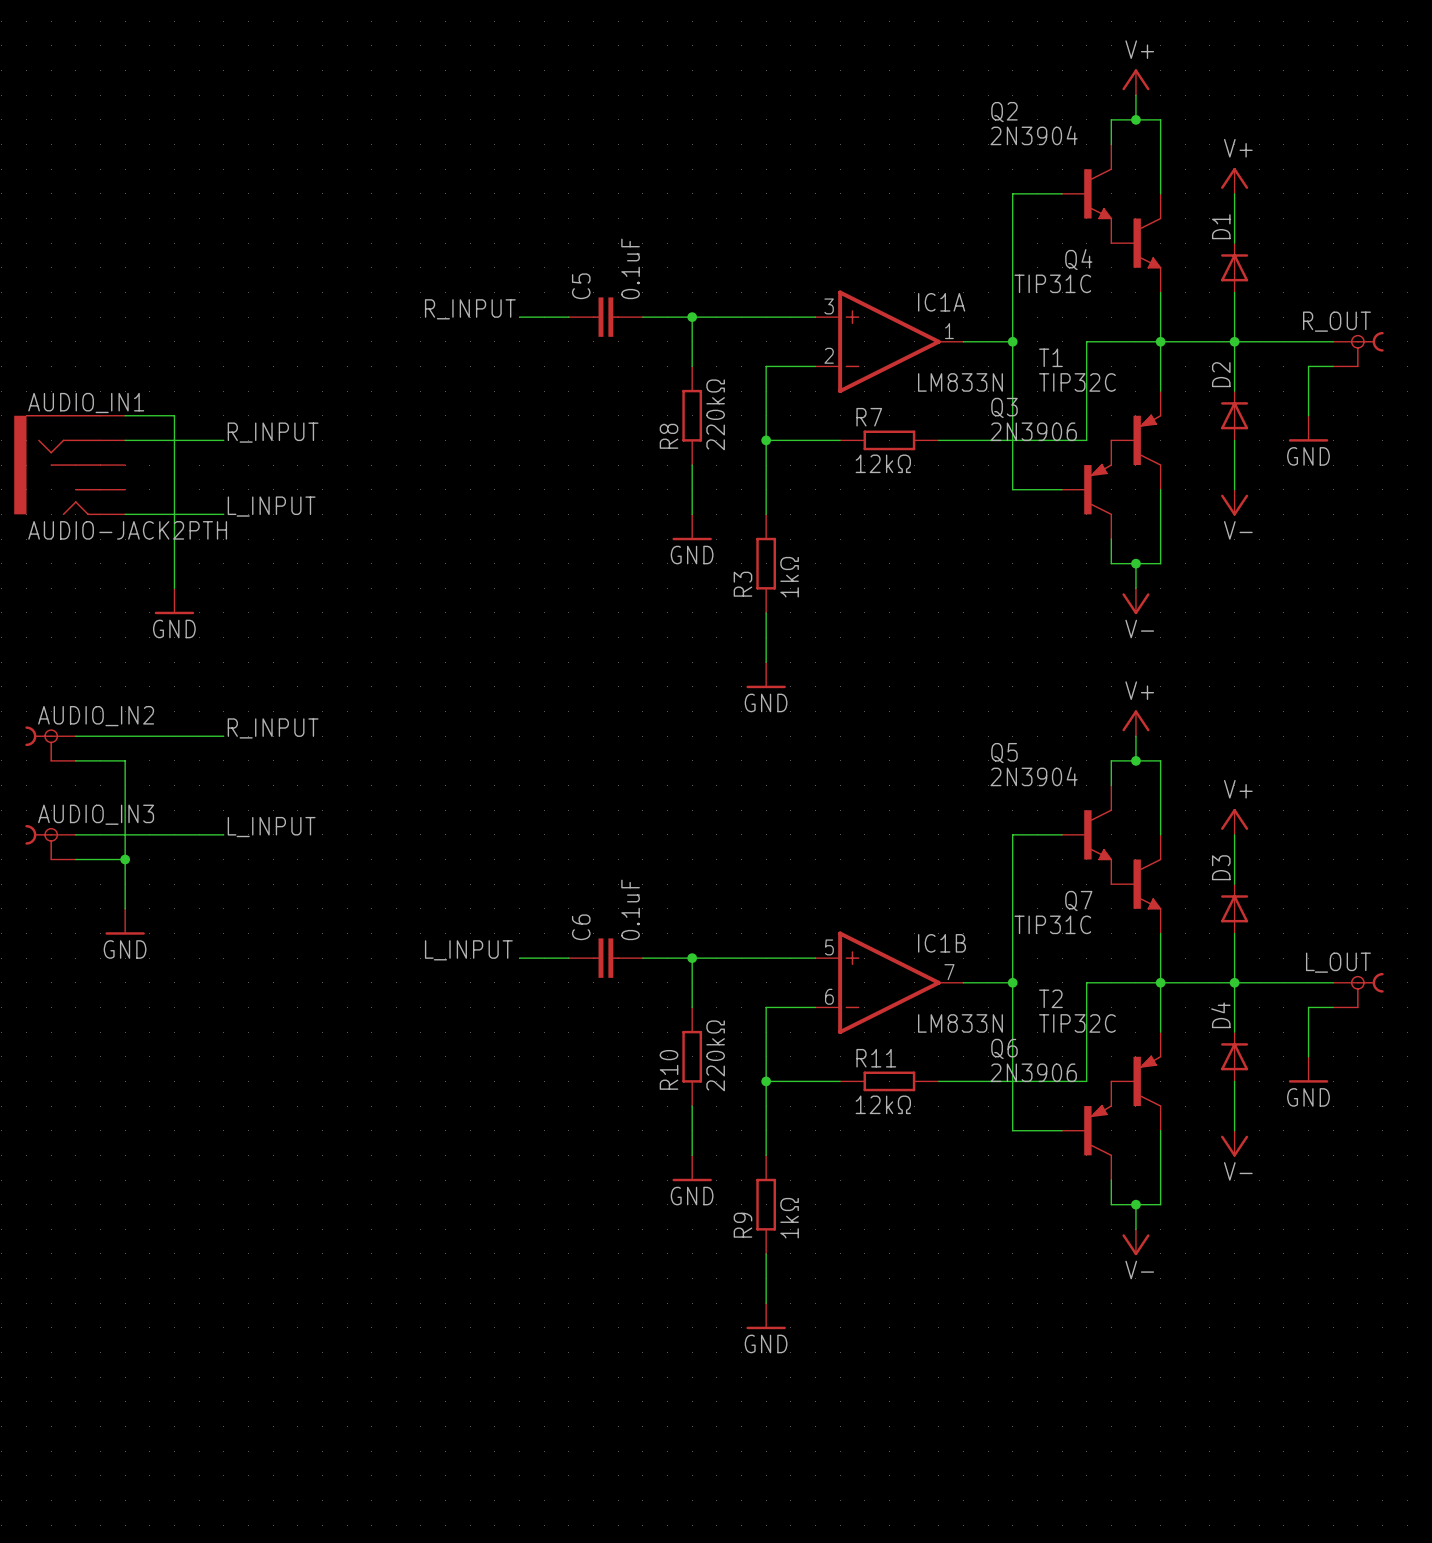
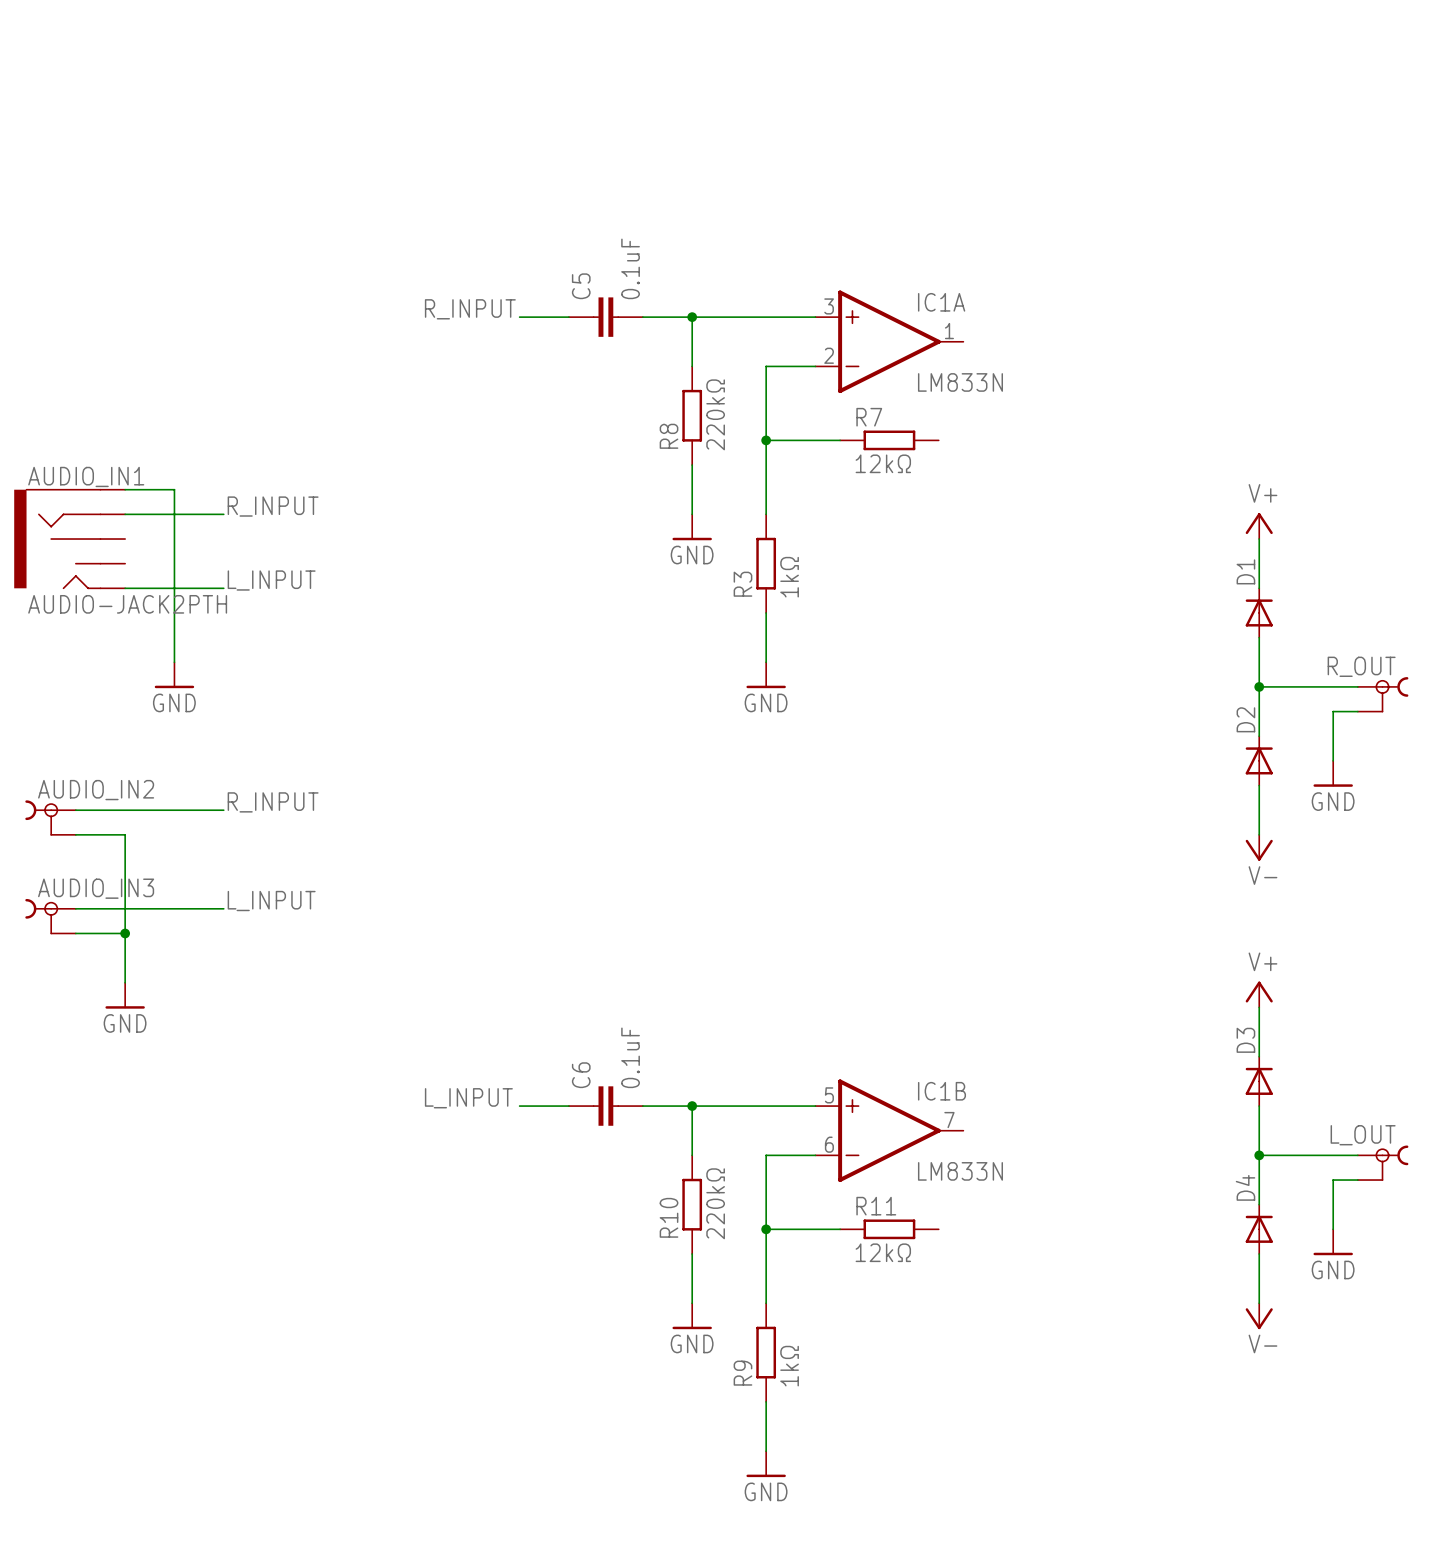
power symbol: V+ (1135, 82) -> none
wire: (1135, 95) (1135, 119) -> none
junction: (1135, 119) -> none
wire: (1111, 144) (1111, 119) (1160, 119) (1160, 193) -> none
power symbol: V+ (1234, 180) -> none
wire: (1062, 193) (1012, 193) (1012, 489) (1062, 489) -> none
Q2: 2N3904 (1087, 193) -> none
wire: (1234, 193) (1234, 243) -> none
Q4: TIP31C (1136, 243) -> none
D1 position: (1234, 267) -> (1259, 612)
wire: (1160, 292) (1160, 391) -> none
wire: (1234, 292) (1234, 391) -> none
wire: (963, 341) (1012, 341) -> none
junction: (1012, 341) -> none
junction: (1160, 341) -> none
junction: (1234, 341) -> none
wire: (1333, 341) (1086, 341) (1086, 440) (938, 440) -> none
R_OUT: (1358, 349) -> none
wire: (1333, 366) (1308, 366) (1308, 415) -> none
wire: (125, 415) (174, 415) (174, 489) -> (125, 489) (174, 489)
D2 position: (1234, 415) -> (1259, 760)
power symbol: GND (1308, 428) -> none
label: R_INPUT (273, 432) -> none
wire: (125, 440) (223, 440) -> (125, 588) (223, 588)
T1: TIP32C (1136, 440) -> none
wire: (1234, 440) (1234, 489) -> (1259, 539) (1259, 588)
AUDIO_IN1 position: (69, 465) -> (69, 539)
Q3: 2N3906 (1087, 489) -> none
wire: (1160, 489) (1160, 563) (1111, 563) (1111, 539) -> none
power symbol: V- (1234, 502) -> none
label: L_INPUT (271, 506) -> R_INPUT (273, 506)
power symbol: none -> V+ (1259, 526)
wire: (1135, 563) (1135, 588) -> none
junction: (1135, 563) -> none
label: none -> L_INPUT (271, 580)
wire: none -> (174, 588) (174, 662)
power symbol position: GND (174, 601) -> GND (174, 675)
power symbol: V- (1135, 601) -> none
wire: none -> (1259, 637) (1259, 736)
wire: none -> (1259, 686) (1357, 686)
junction: none -> (1259, 686)
R_OUT: none -> (1383, 694)
wire: none -> (1357, 711) (1333, 711) (1333, 760)
power symbol: V+ (1135, 723) -> none
label position: R_INPUT (273, 728) -> R_INPUT (273, 802)
wire: (75, 736) (223, 736) -> (75, 810) (223, 810)
wire: (1135, 736) (1135, 760) -> none
AUDIO_IN2 position: (50, 744) -> (50, 817)
wire: (75, 760) (125, 760) (125, 834) (223, 834) -> none
junction: (1135, 760) -> none
power symbol: none -> GND (1333, 773)
wire: (1111, 785) (1111, 760) (1160, 760) (1160, 834) -> none
wire: none -> (1259, 785) (1259, 834)
power symbol: V+ (1234, 821) -> none
label position: L_INPUT (271, 827) -> L_INPUT (271, 901)
wire: (1062, 834) (1012, 834) (1012, 1130) (1062, 1130) -> none
Q5: 2N3904 (1087, 834) -> none
wire: (1234, 834) (1234, 884) -> (1259, 1007) (1259, 1056)
AUDIO_IN3 position: (50, 842) -> (50, 916)
power symbol: none -> V- (1259, 847)
wire: (75, 859) (125, 859) -> (75, 933) (125, 933)
junction: (125, 859) -> none
Q7: TIP31C (1136, 884) -> none
wire: none -> (75, 908) (223, 908)
wire: none -> (125, 908) (125, 982)
D3 position: (1234, 908) -> (1259, 1081)
power symbol position: GND (125, 921) -> GND (125, 995)
junction: none -> (125, 933)
wire: (1160, 933) (1160, 1032) -> none
wire: (1234, 933) (1234, 1032) -> (1259, 1106) (1259, 1204)
label: L_INPUT (468, 950) -> none
wire: (519, 958) (568, 958) -> (519, 1106) (568, 1106)
C6 position: (605, 958) -> (605, 1106)
wire: (642, 958) (815, 958) -> (642, 1106) (815, 1106)
wire: (692, 958) (692, 1007) -> none
junction: (692, 958) -> none
IC1B position: (889, 982) -> (889, 1130)
wire: (963, 982) (1012, 982) -> none
junction: (1012, 982) -> none
junction: (1160, 982) -> none
junction: (1234, 982) -> none
wire: (1333, 982) (1086, 982) (1086, 1081) (938, 1081) -> none
L_OUT position: (1358, 990) -> (1383, 1163)
power symbol: none -> V+ (1259, 994)
wire: (815, 1007) (766, 1007) (766, 1155) -> none
wire: (1333, 1007) (1308, 1007) (1308, 1056) -> (1357, 1180) (1333, 1180) (1333, 1229)
R10 position: (692, 1056) -> (692, 1204)
D4 position: (1234, 1056) -> (1259, 1229)
power symbol: GND (1308, 1069) -> none
wire: (766, 1081) (840, 1081) -> (766, 1229) (840, 1229)
junction: (766, 1081) -> none
R11 position: (889, 1081) -> (889, 1229)
T2: TIP32C (1136, 1081) -> none
wire: (1234, 1081) (1234, 1130) -> (1259, 1253) (1259, 1303)
label: none -> L_INPUT (468, 1098)
junction: none -> (692, 1106)
Q6: 2N3906 (1087, 1130) -> none
wire: (1160, 1130) (1160, 1204) (1111, 1204) (1111, 1180) -> none
power symbol: V- (1234, 1143) -> none
wire: none -> (815, 1155) (766, 1155) (766, 1253)
wire: none -> (1259, 1155) (1357, 1155)
junction: none -> (1259, 1155)
power symbol: GND (692, 1168) -> none
R9 position: (766, 1204) -> (766, 1352)
wire: (1135, 1204) (1135, 1229) -> none
junction: (1135, 1204) -> none
junction: none -> (766, 1229)
power symbol: V- (1135, 1242) -> none
power symbol: none -> GND (1333, 1242)
wire: none -> (692, 1253) (692, 1303)
power symbol: none -> GND (692, 1316)
power symbol: GND (766, 1316) -> none
power symbol: none -> V- (1259, 1316)
wire: none -> (766, 1401) (766, 1451)
power symbol: none -> GND (766, 1464)

